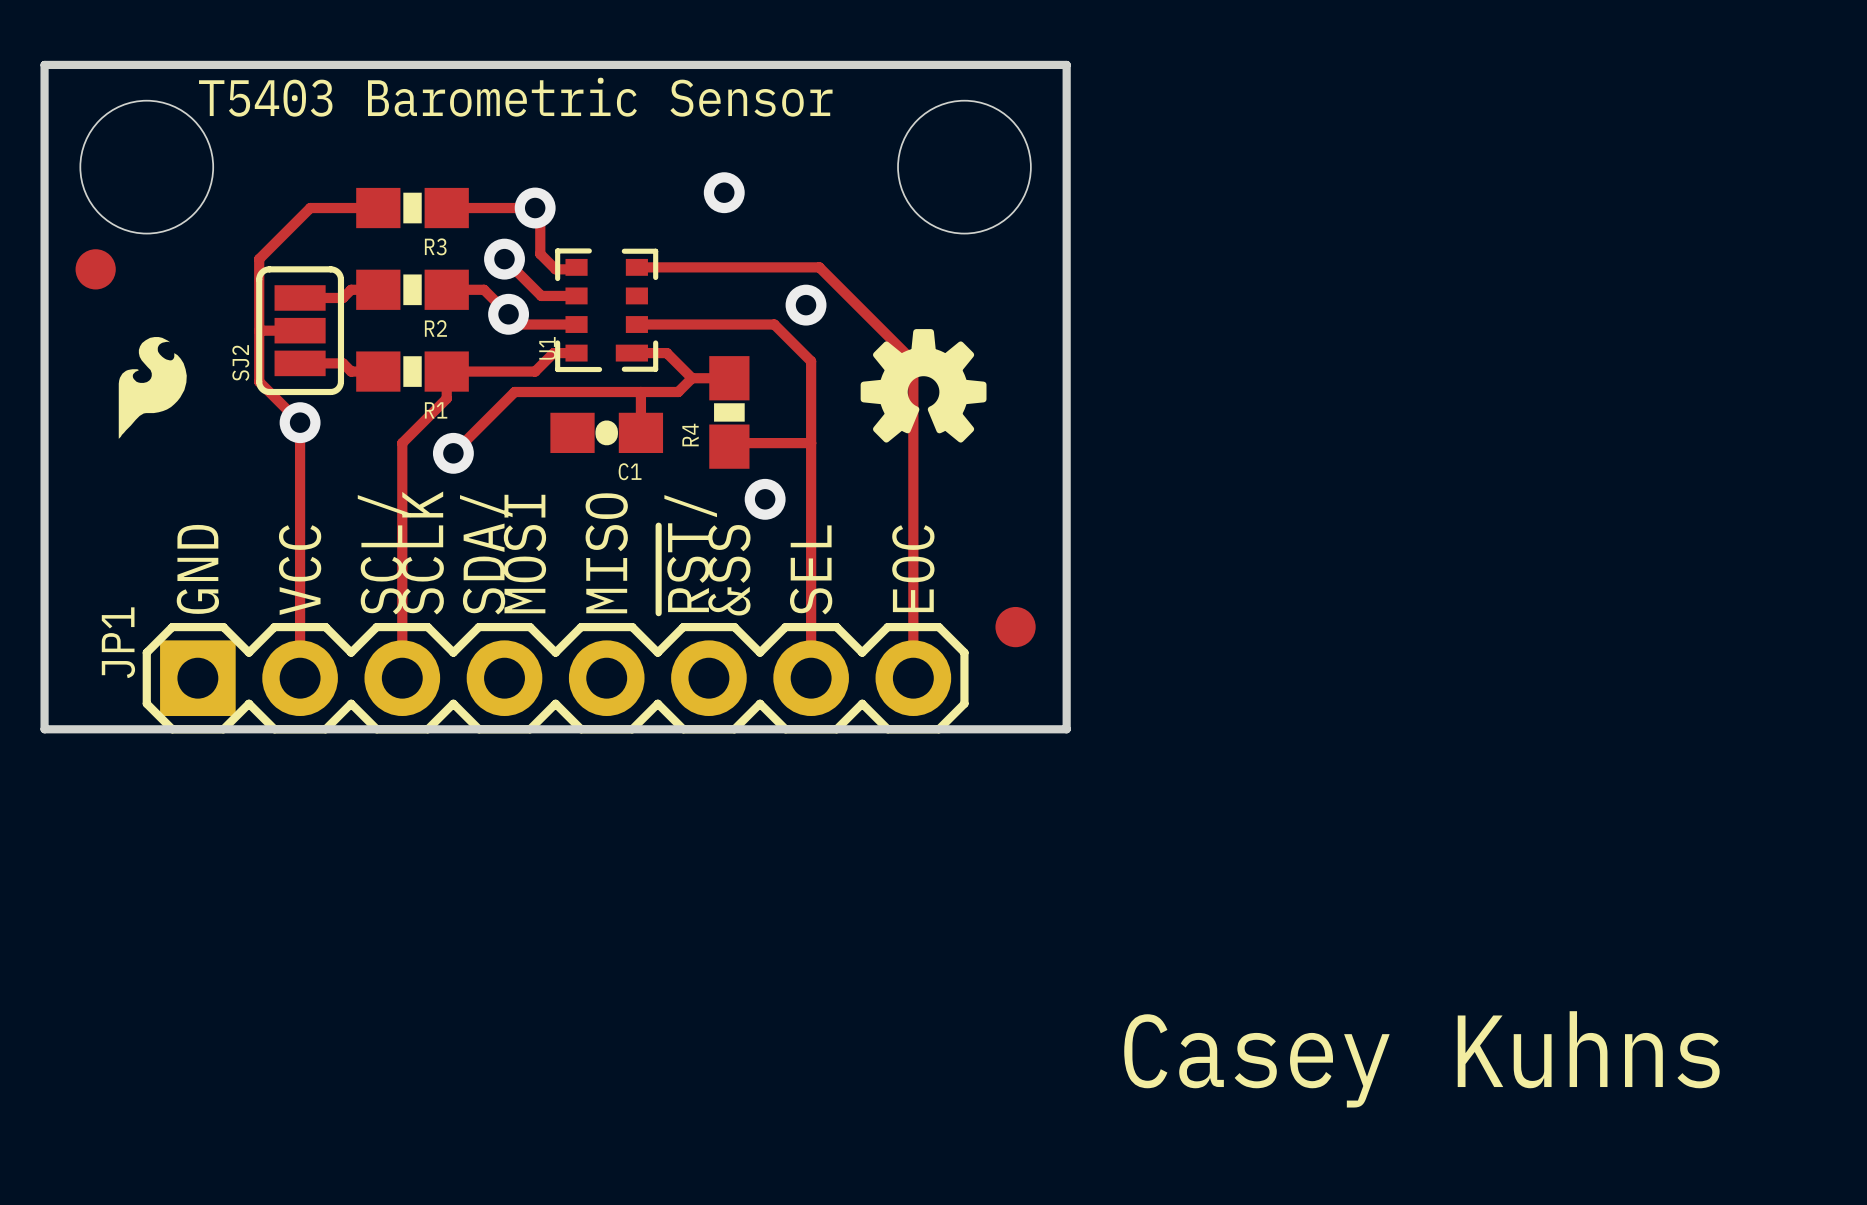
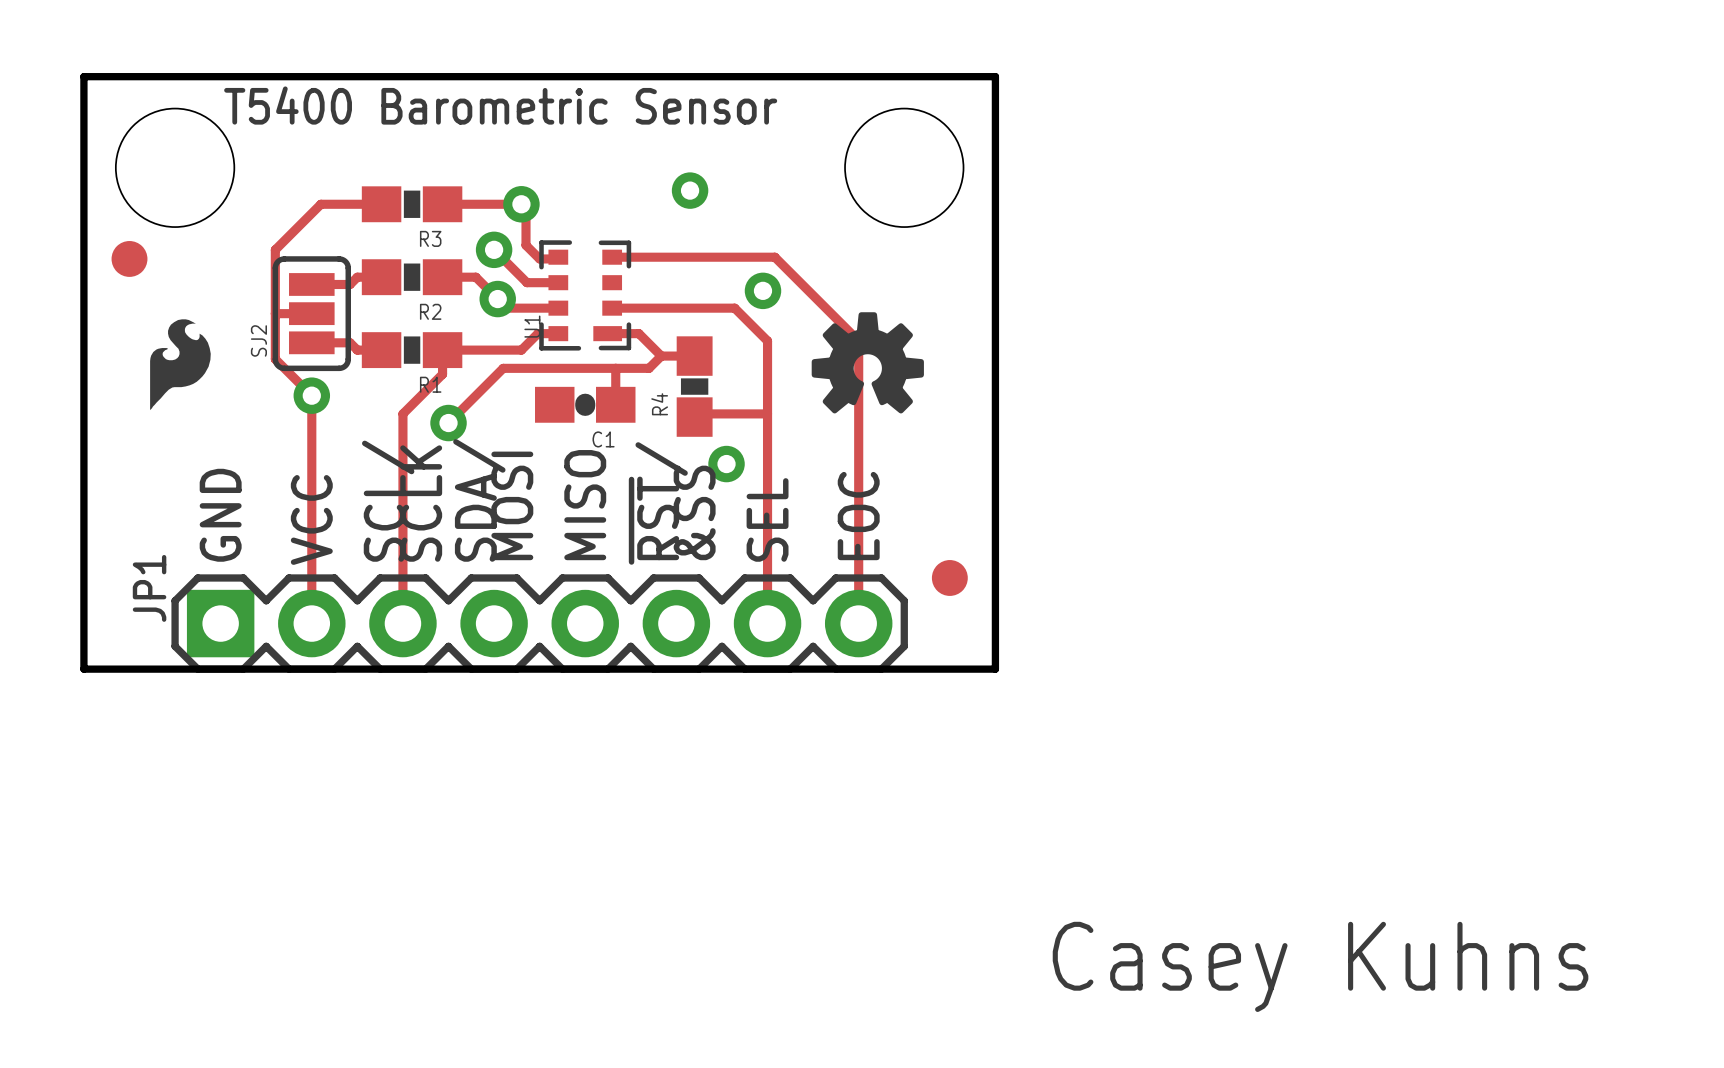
text: T5403 Barometric Sensor (515, 97) -> T5400 Barometric Sensor (500, 105)

